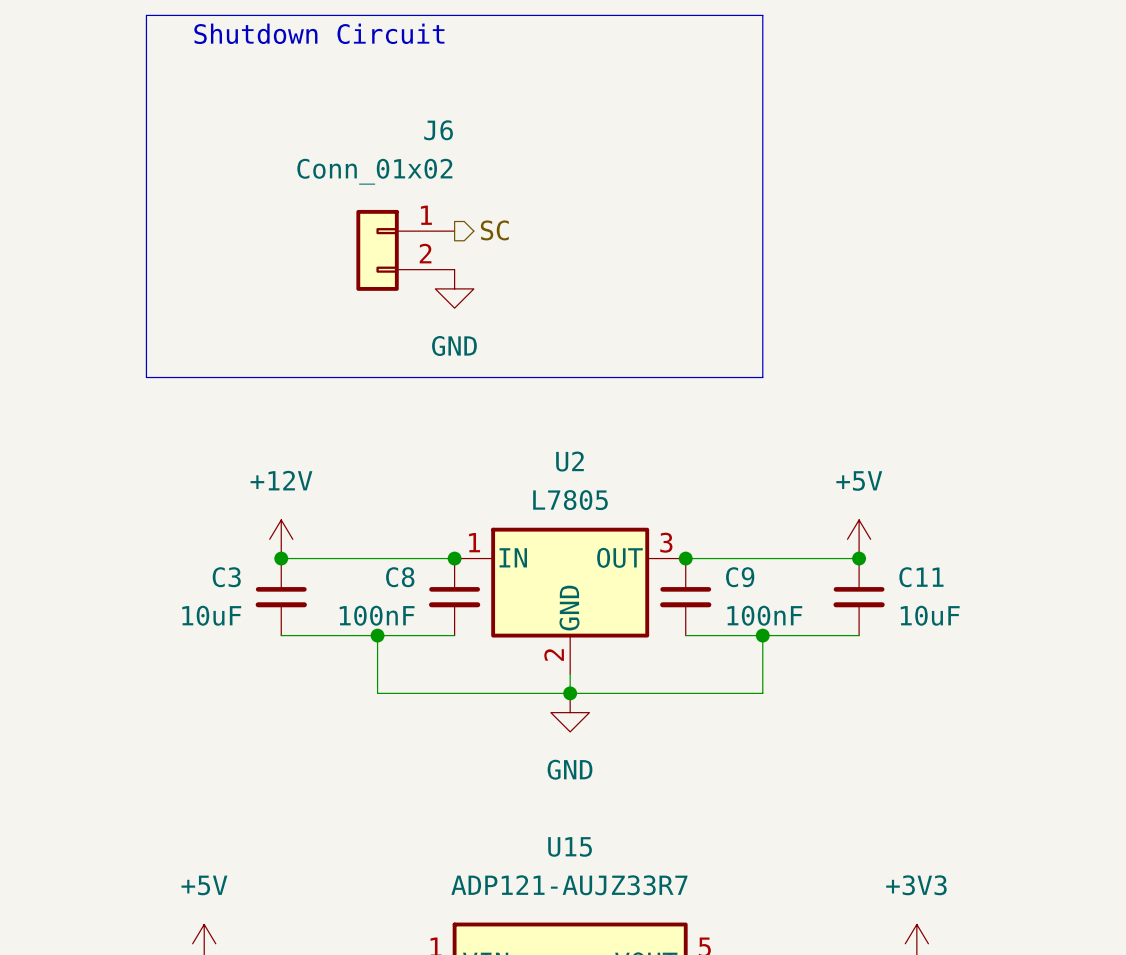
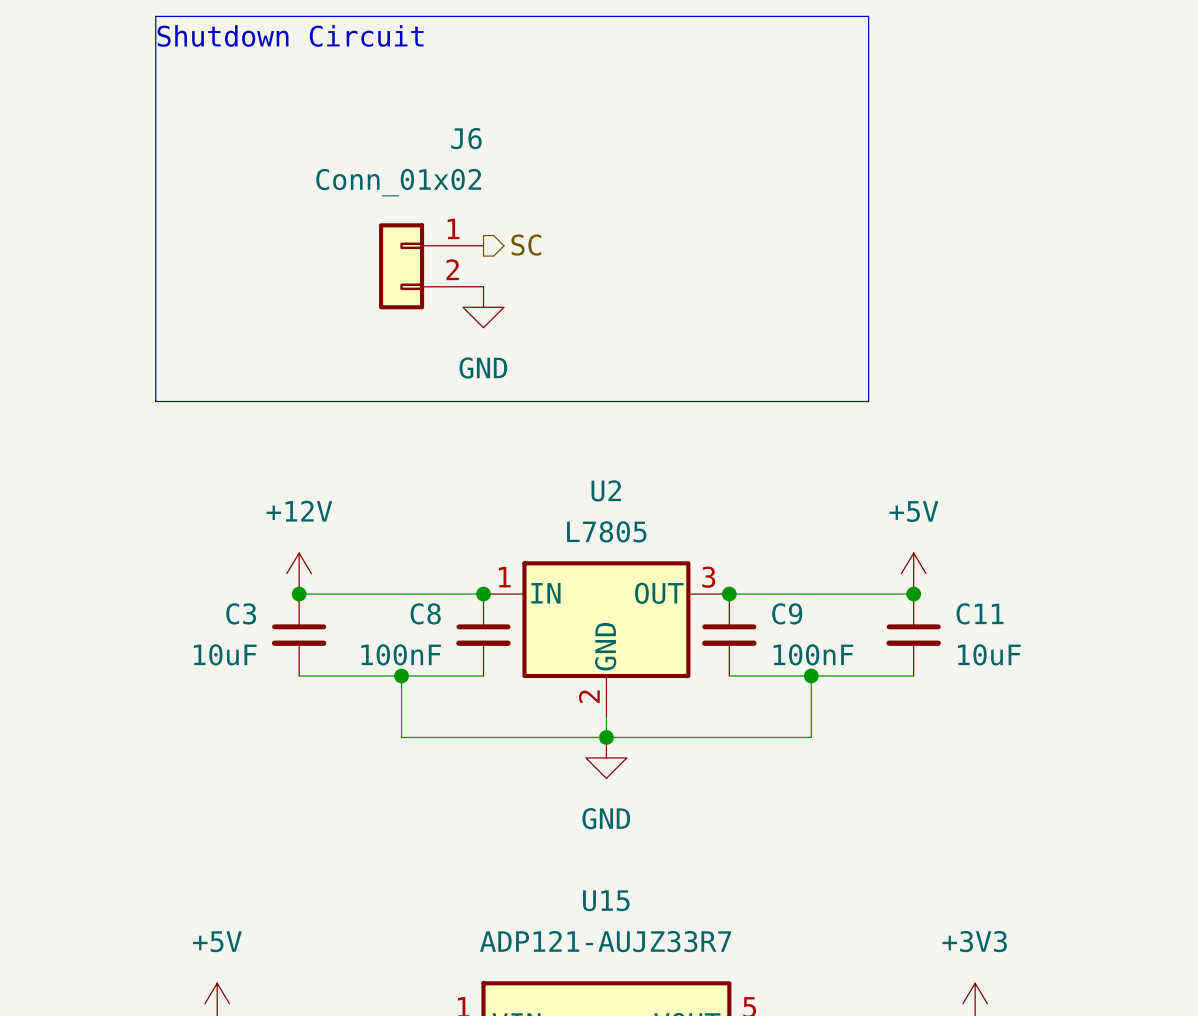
line: (762, 15) (762, 377) -> (811, 16) (868, 16) (868, 401) (811, 401)
text position: Shutdown Circuit (319, 33) -> Shutdown Circuit (290, 35)

